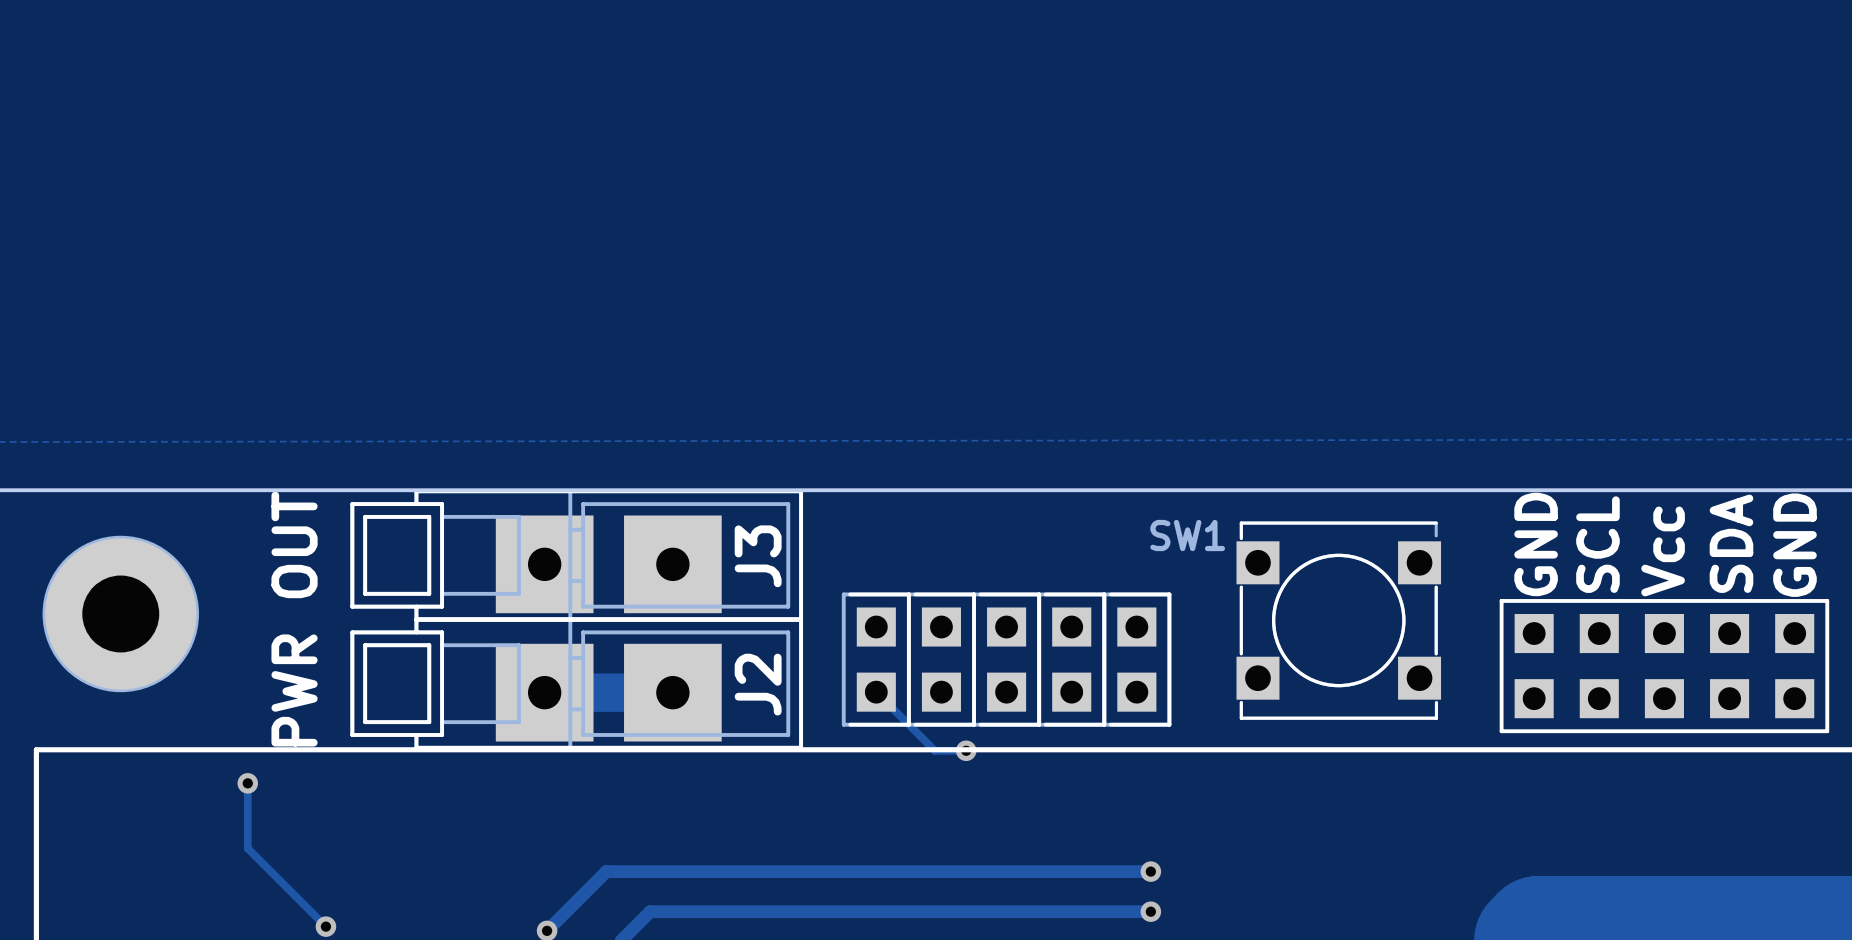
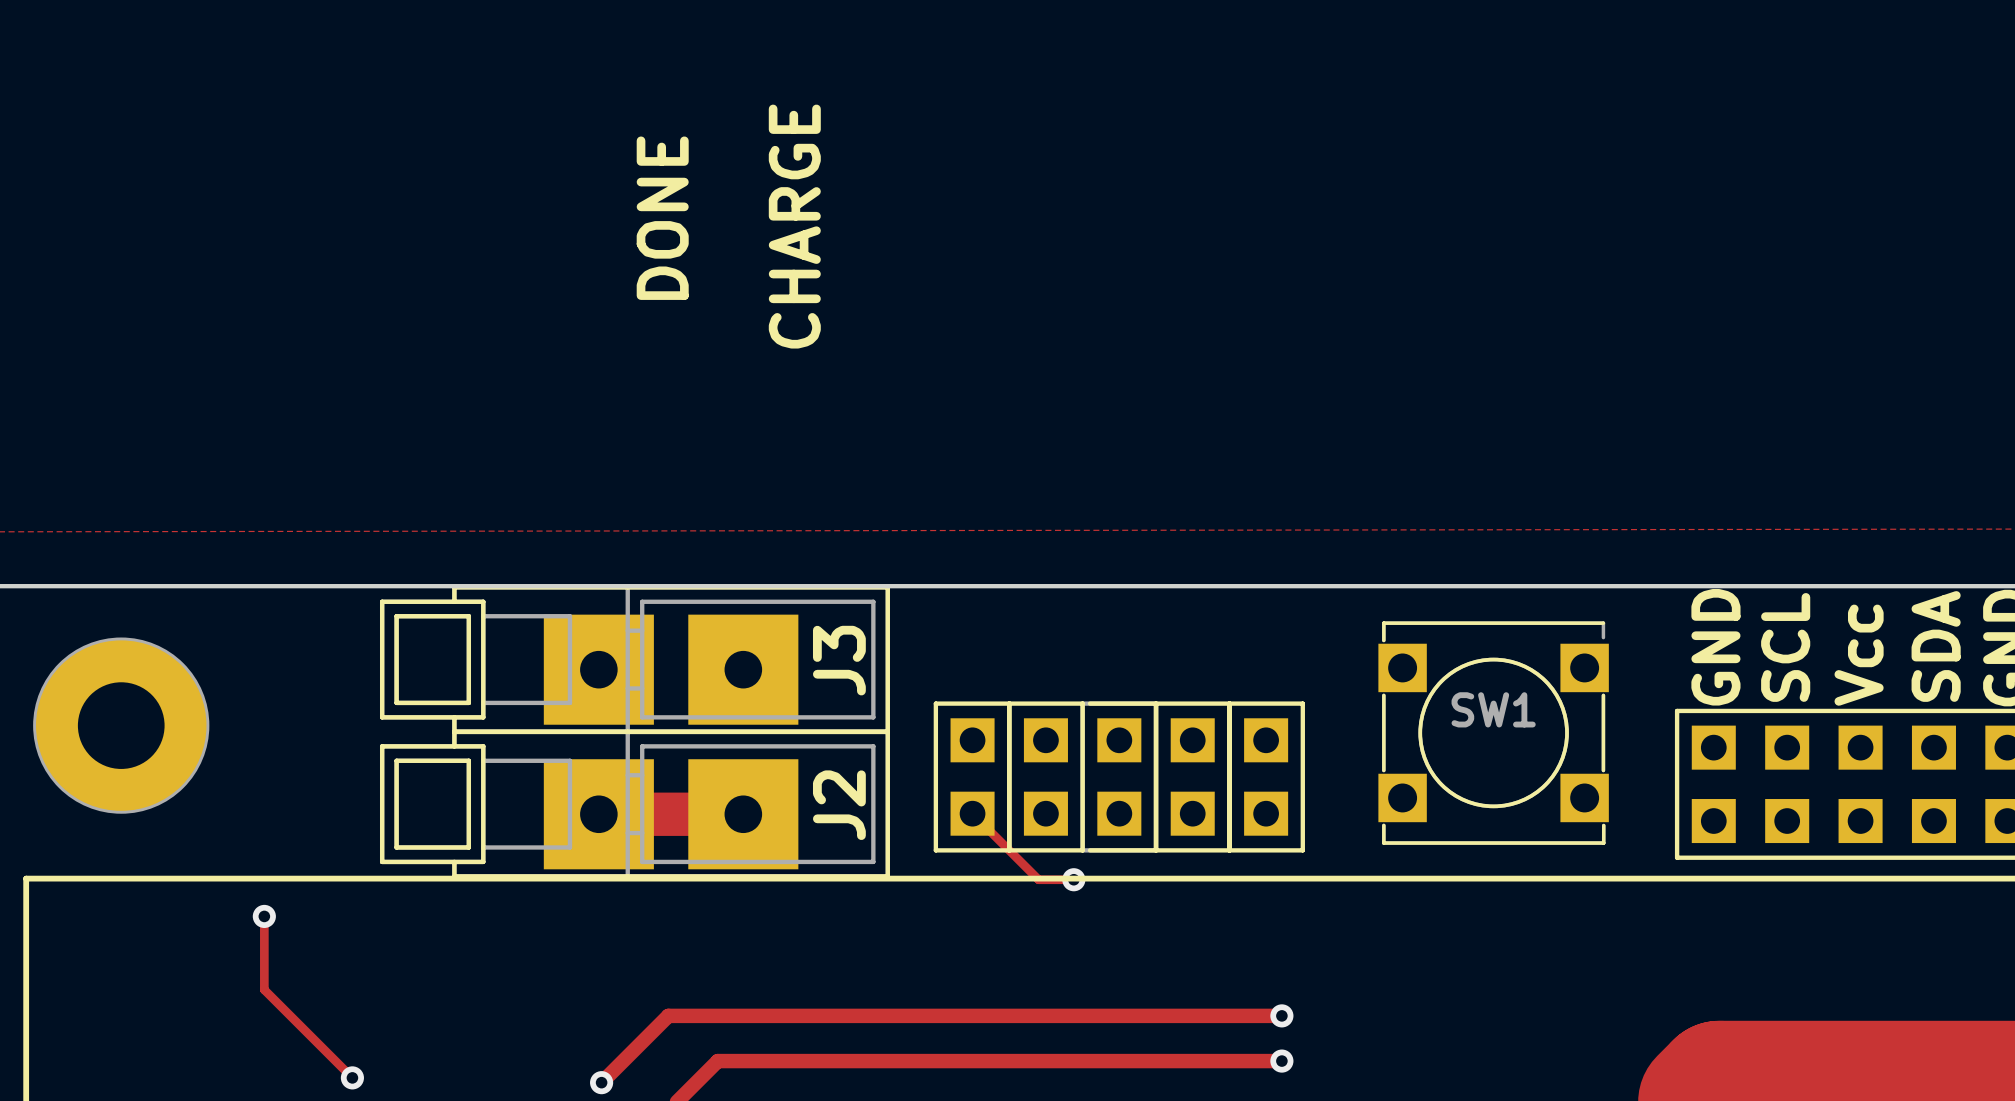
text: none -> DONE (662, 218)
text: none -> CHARGE (794, 226)
SW1 name position: SW1 (1187, 535) -> SW1 (1493, 709)
part footprint: [841, 592, 911, 727] -> [933, 701, 1012, 853]
part footprint: [906, 592, 976, 727] -> [1007, 701, 1085, 853]
part footprint: [1037, 592, 1107, 727] -> [1153, 701, 1232, 853]
part footprint: [1102, 592, 1172, 727] -> [1227, 701, 1305, 853]
text: PWR OUT (294, 619) -> none

